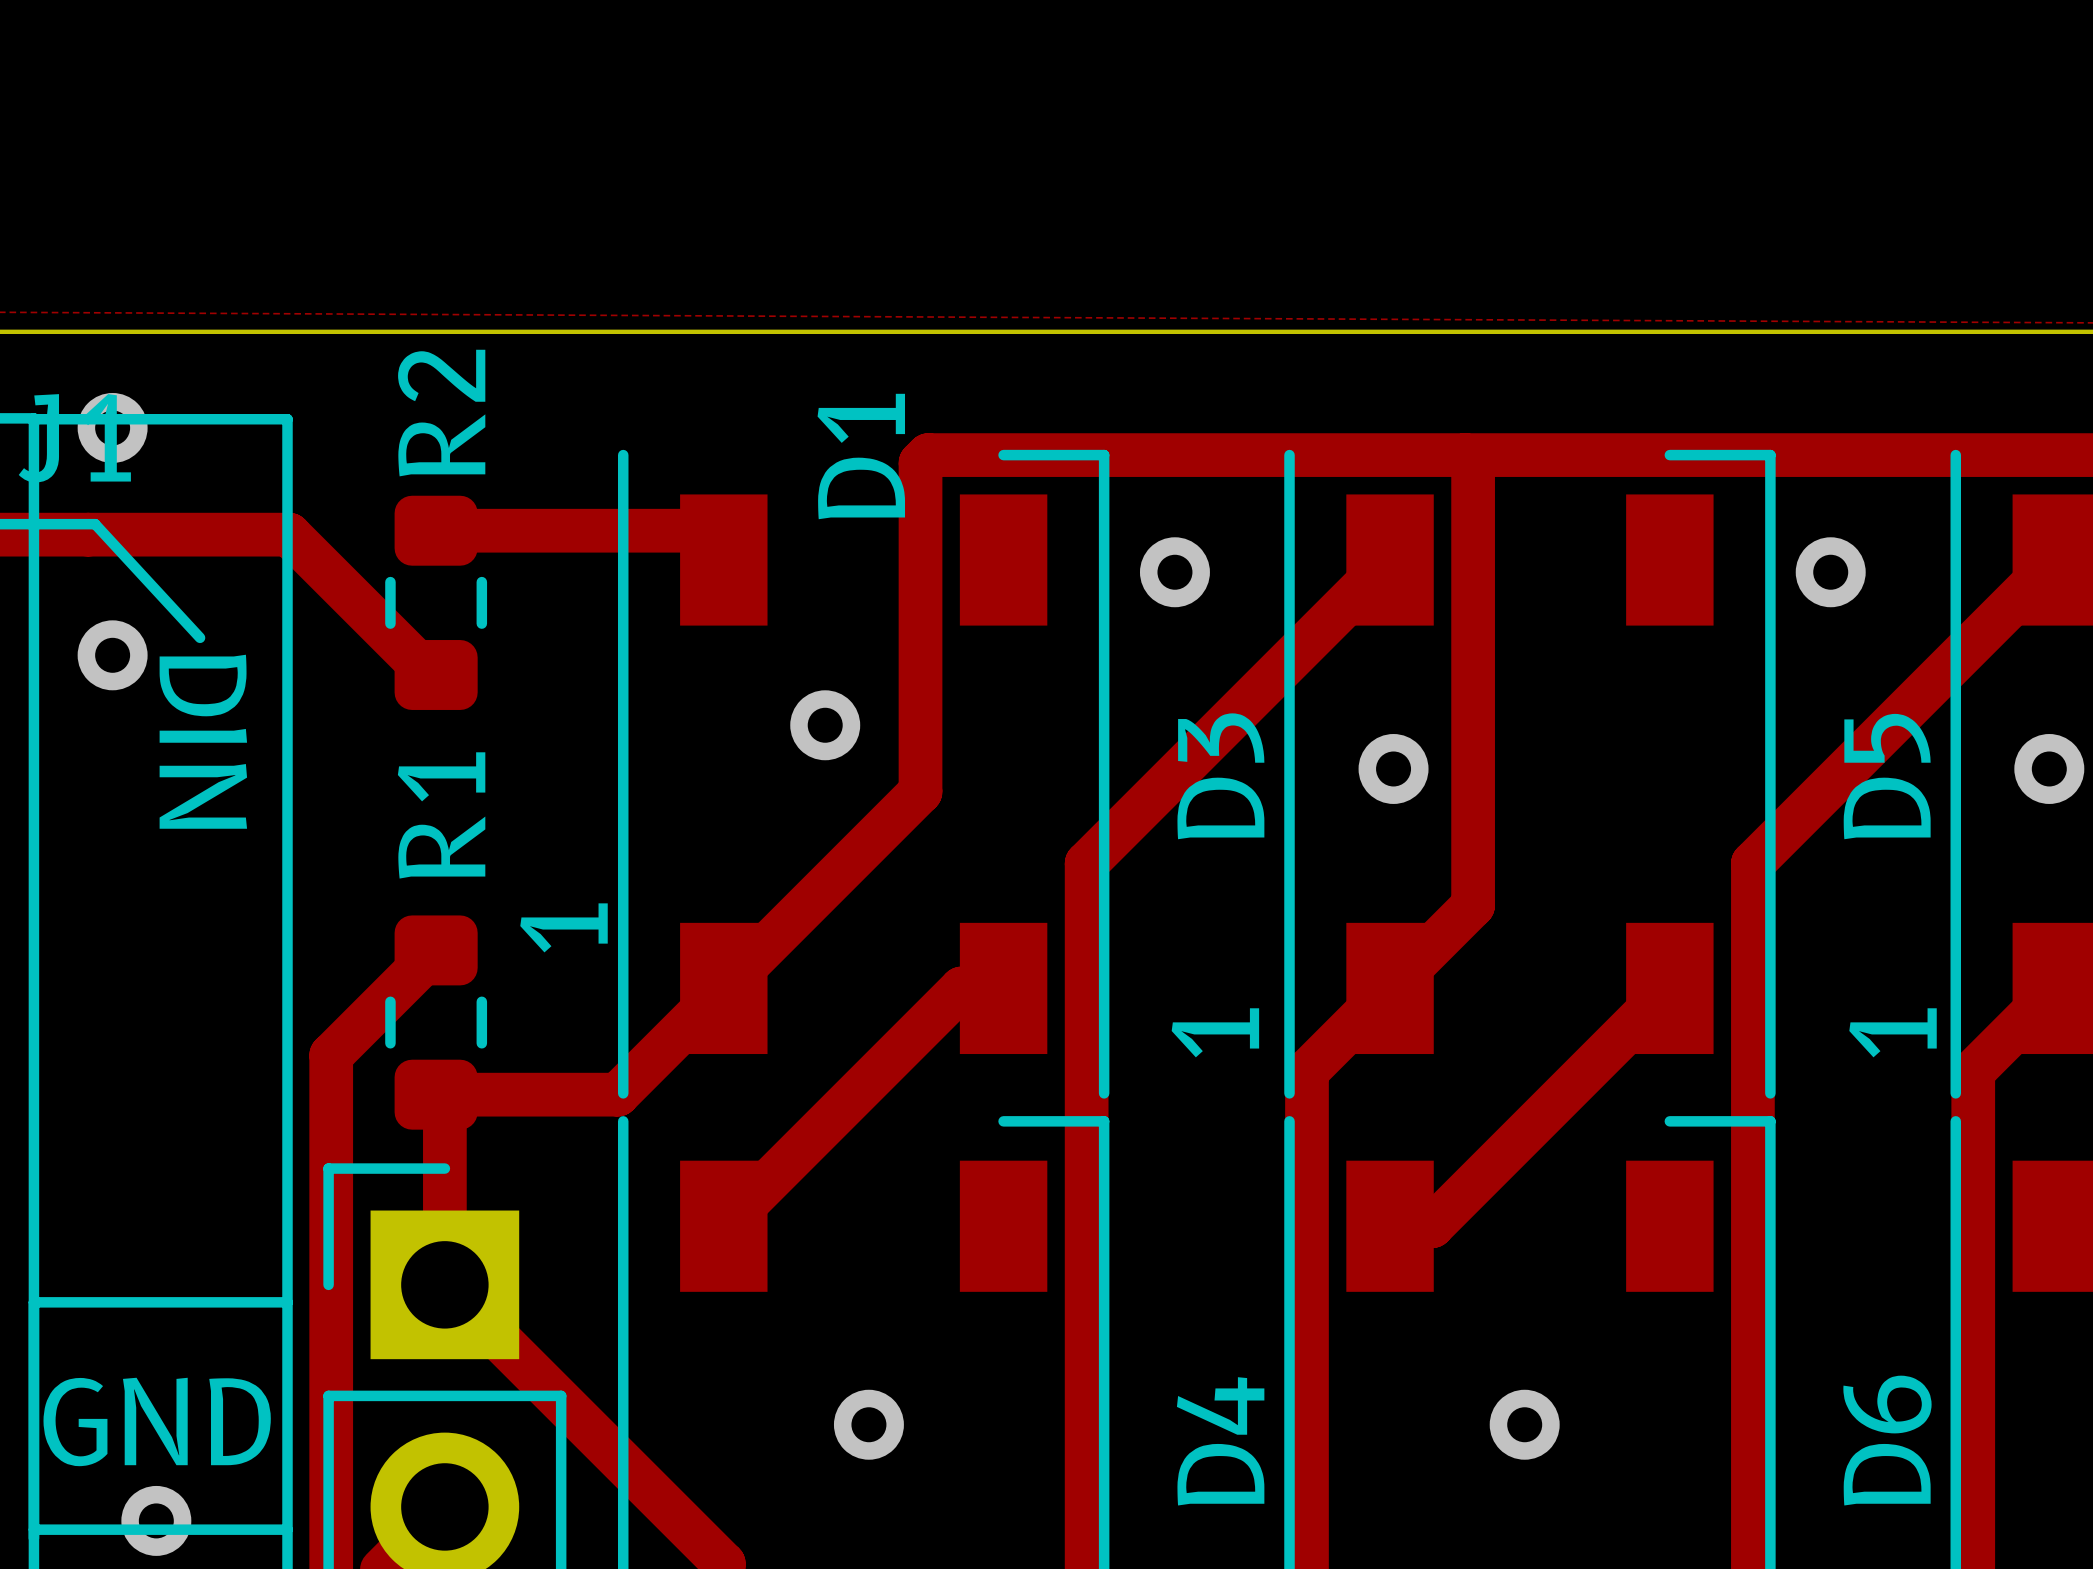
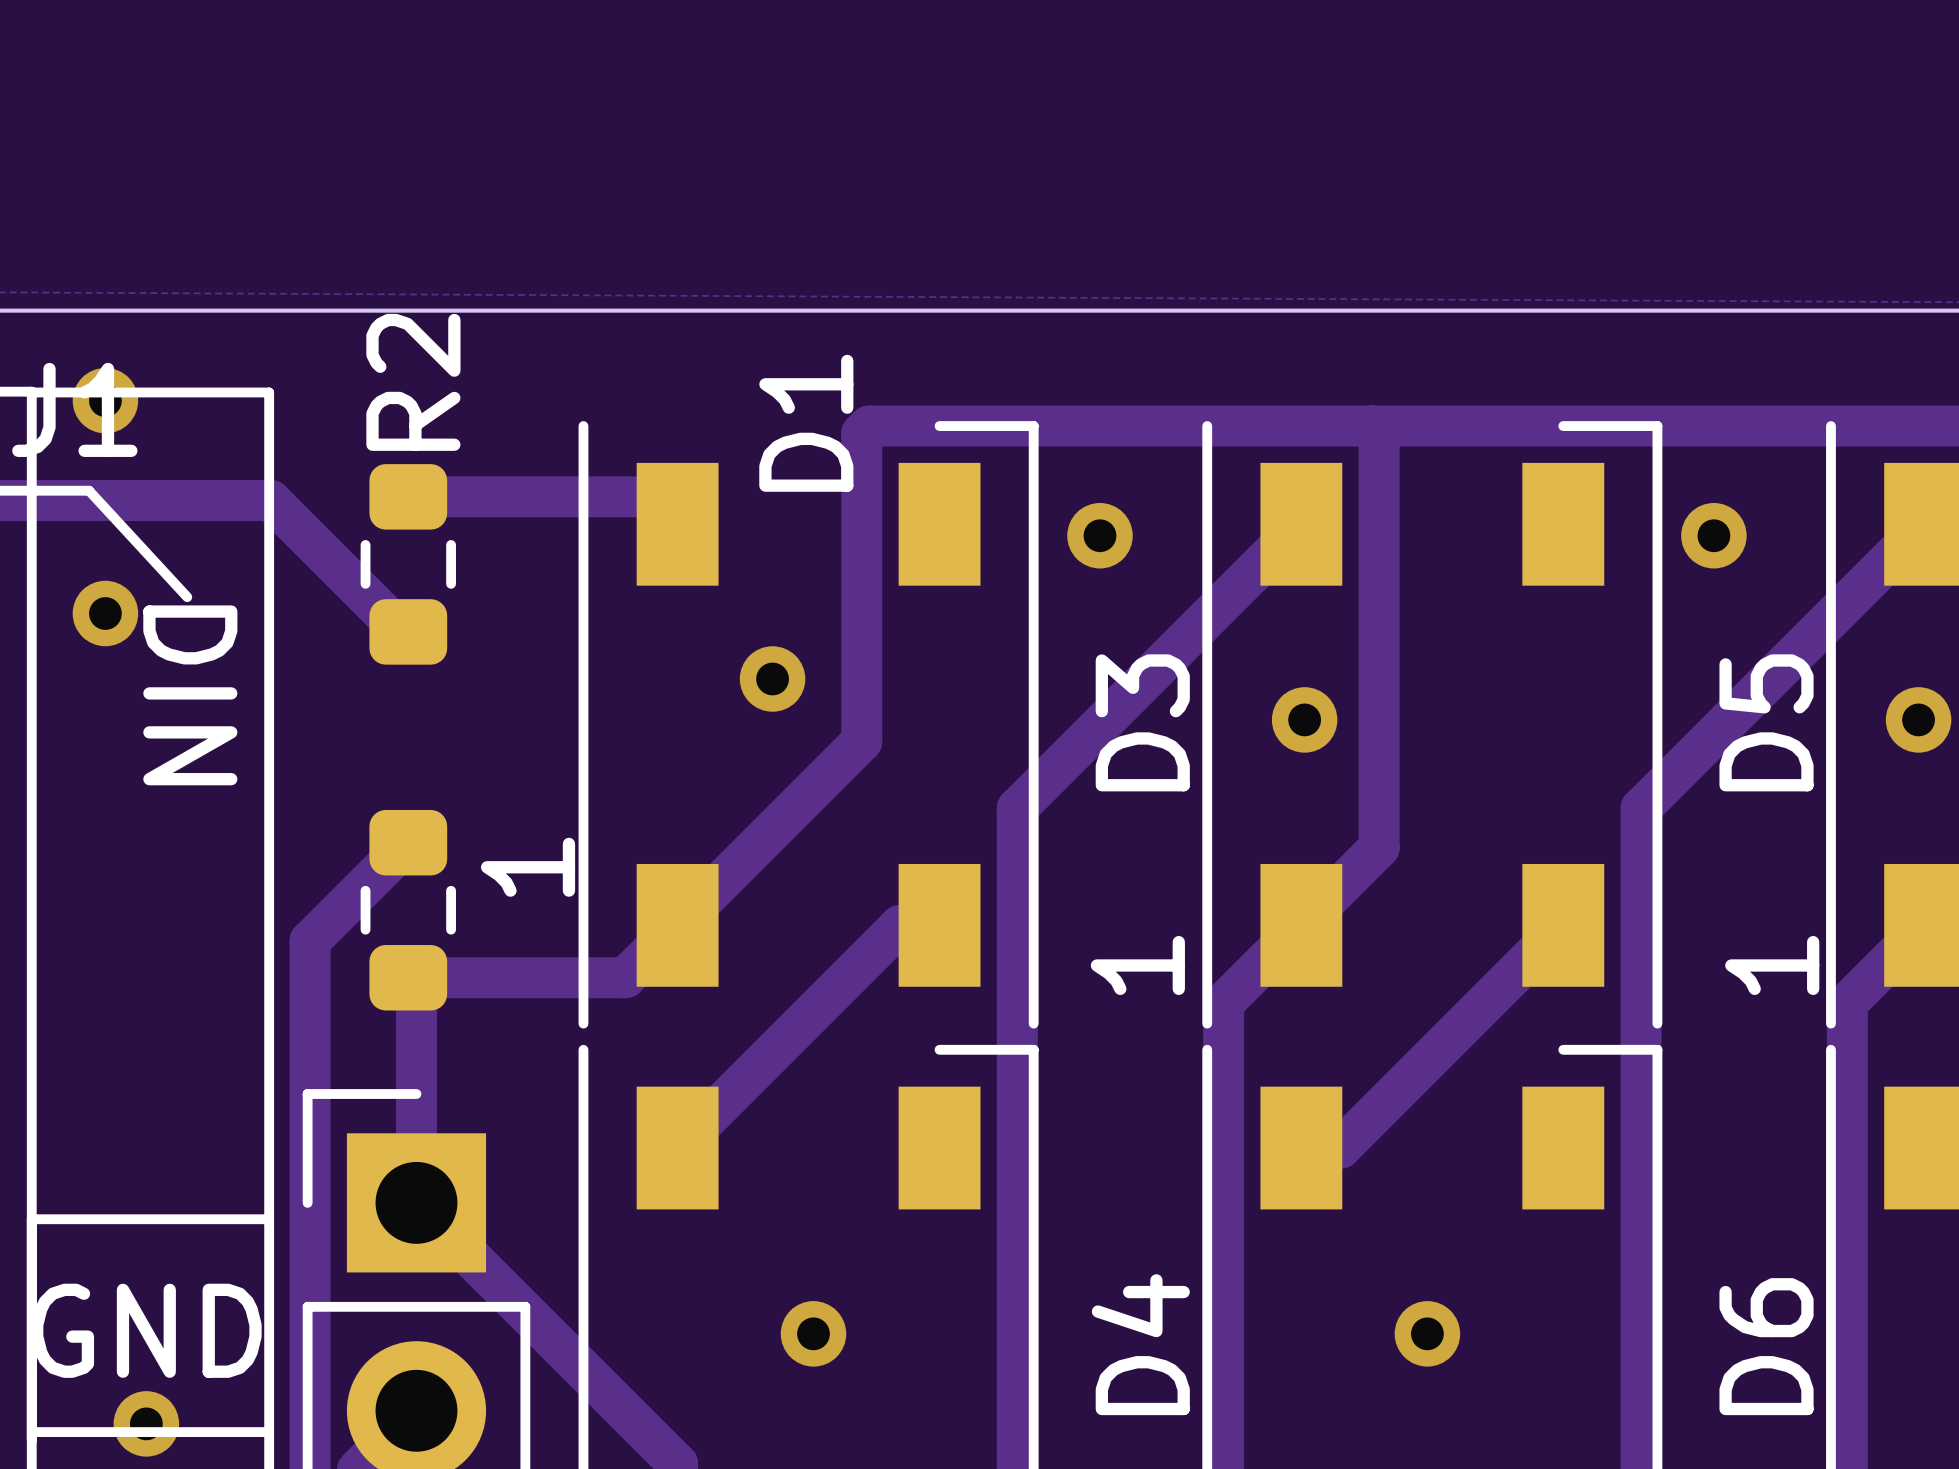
R1 name: R1 (441, 815) -> none
track: (436, 950) (331, 1055) -> (408, 842) (310, 940) (310, 988)
R1 position: (436, 1022) -> (408, 910)
track: (667, 1044) (617, 1094) (436, 1094) (444, 1103) -> (625, 977) (408, 977) (416, 985) (416, 1033)

